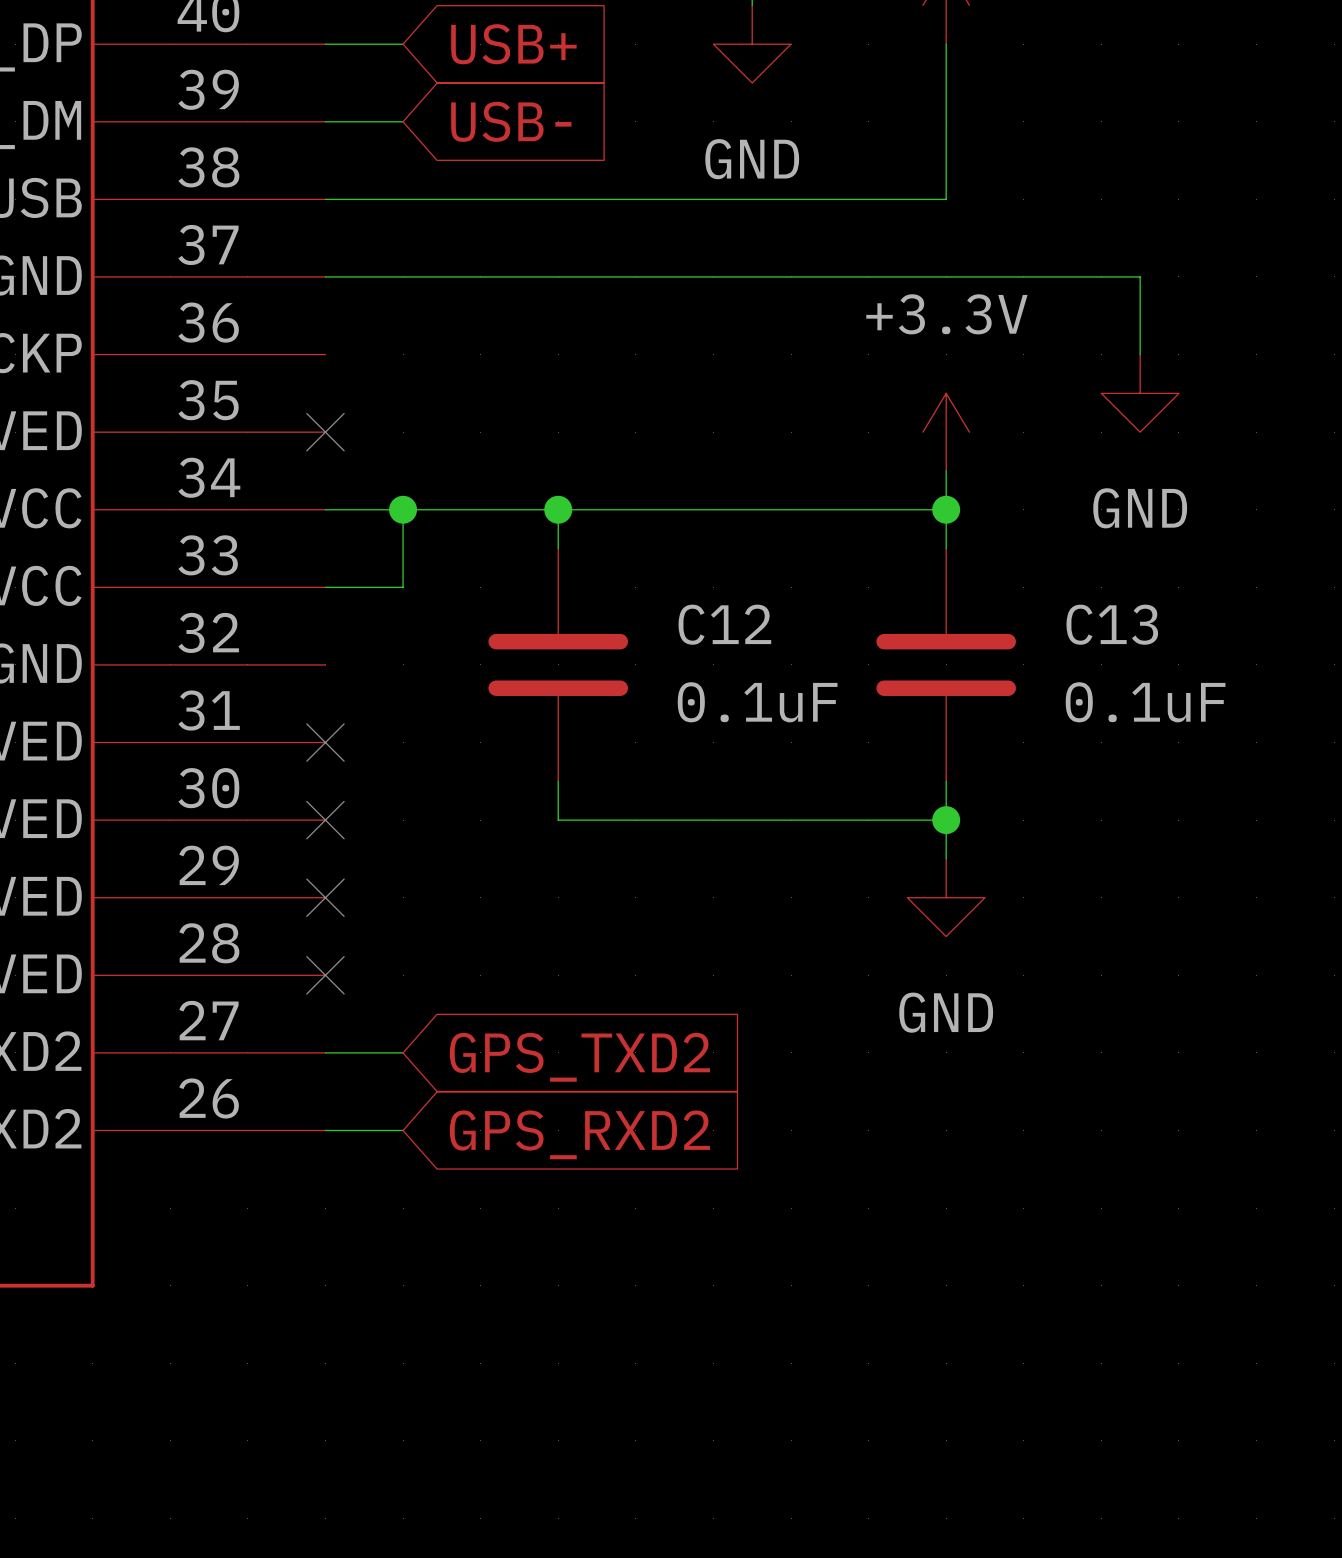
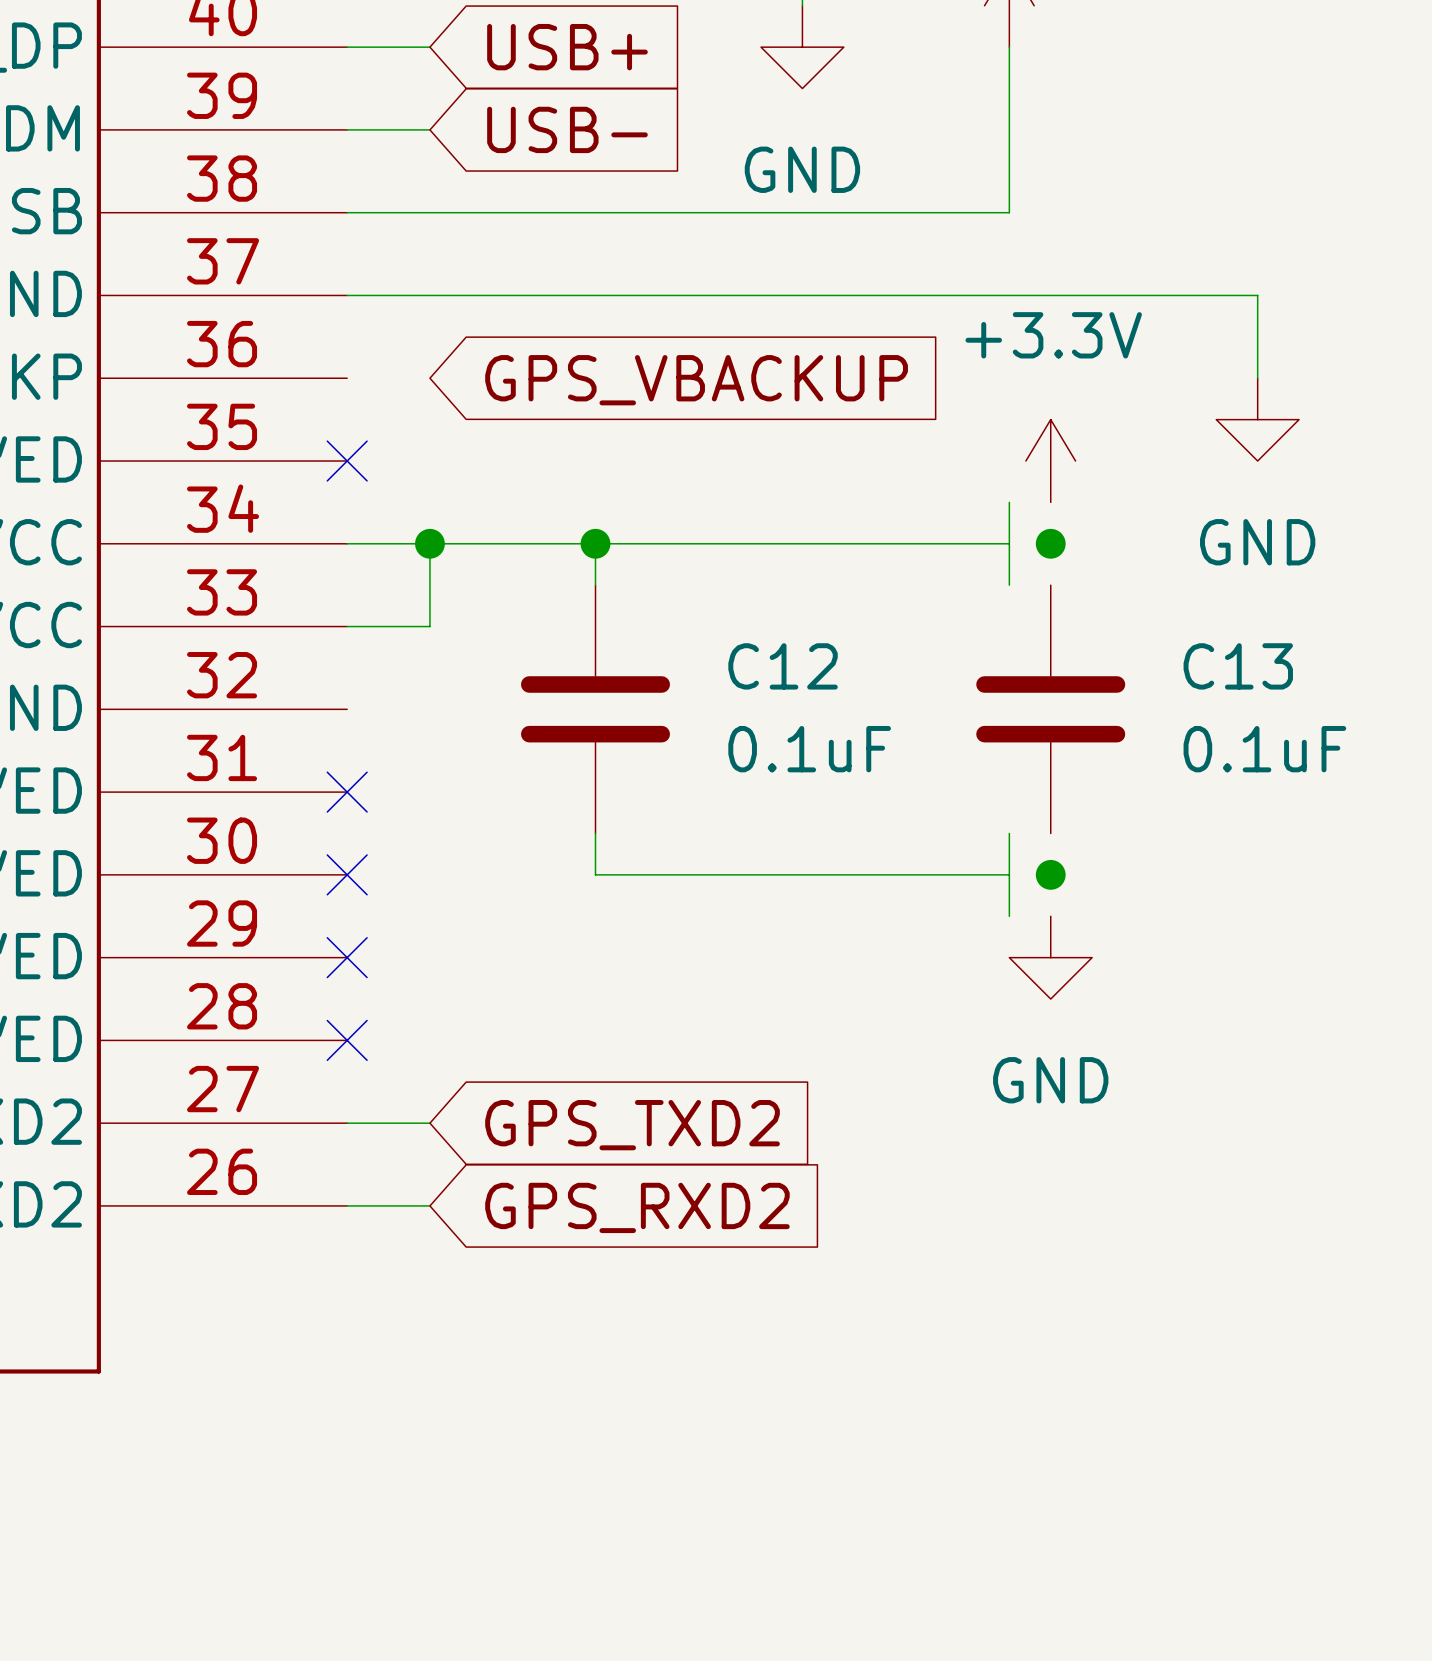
wire: (1140, 276) (1140, 354) -> (1216, 295) (1257, 295) (1257, 378)
global label: none -> GPS_VBACKUP (696, 380)
power symbol position: GND (1140, 393) -> GND (1257, 419)
power symbol position: +3.3V (946, 432) -> +3.3V (1050, 461)
junction position: (946, 509) -> (1050, 543)
C13 position: (946, 664) -> (1050, 709)
junction position: (946, 820) -> (1050, 874)
power symbol position: GND (946, 897) -> GND (1050, 957)

